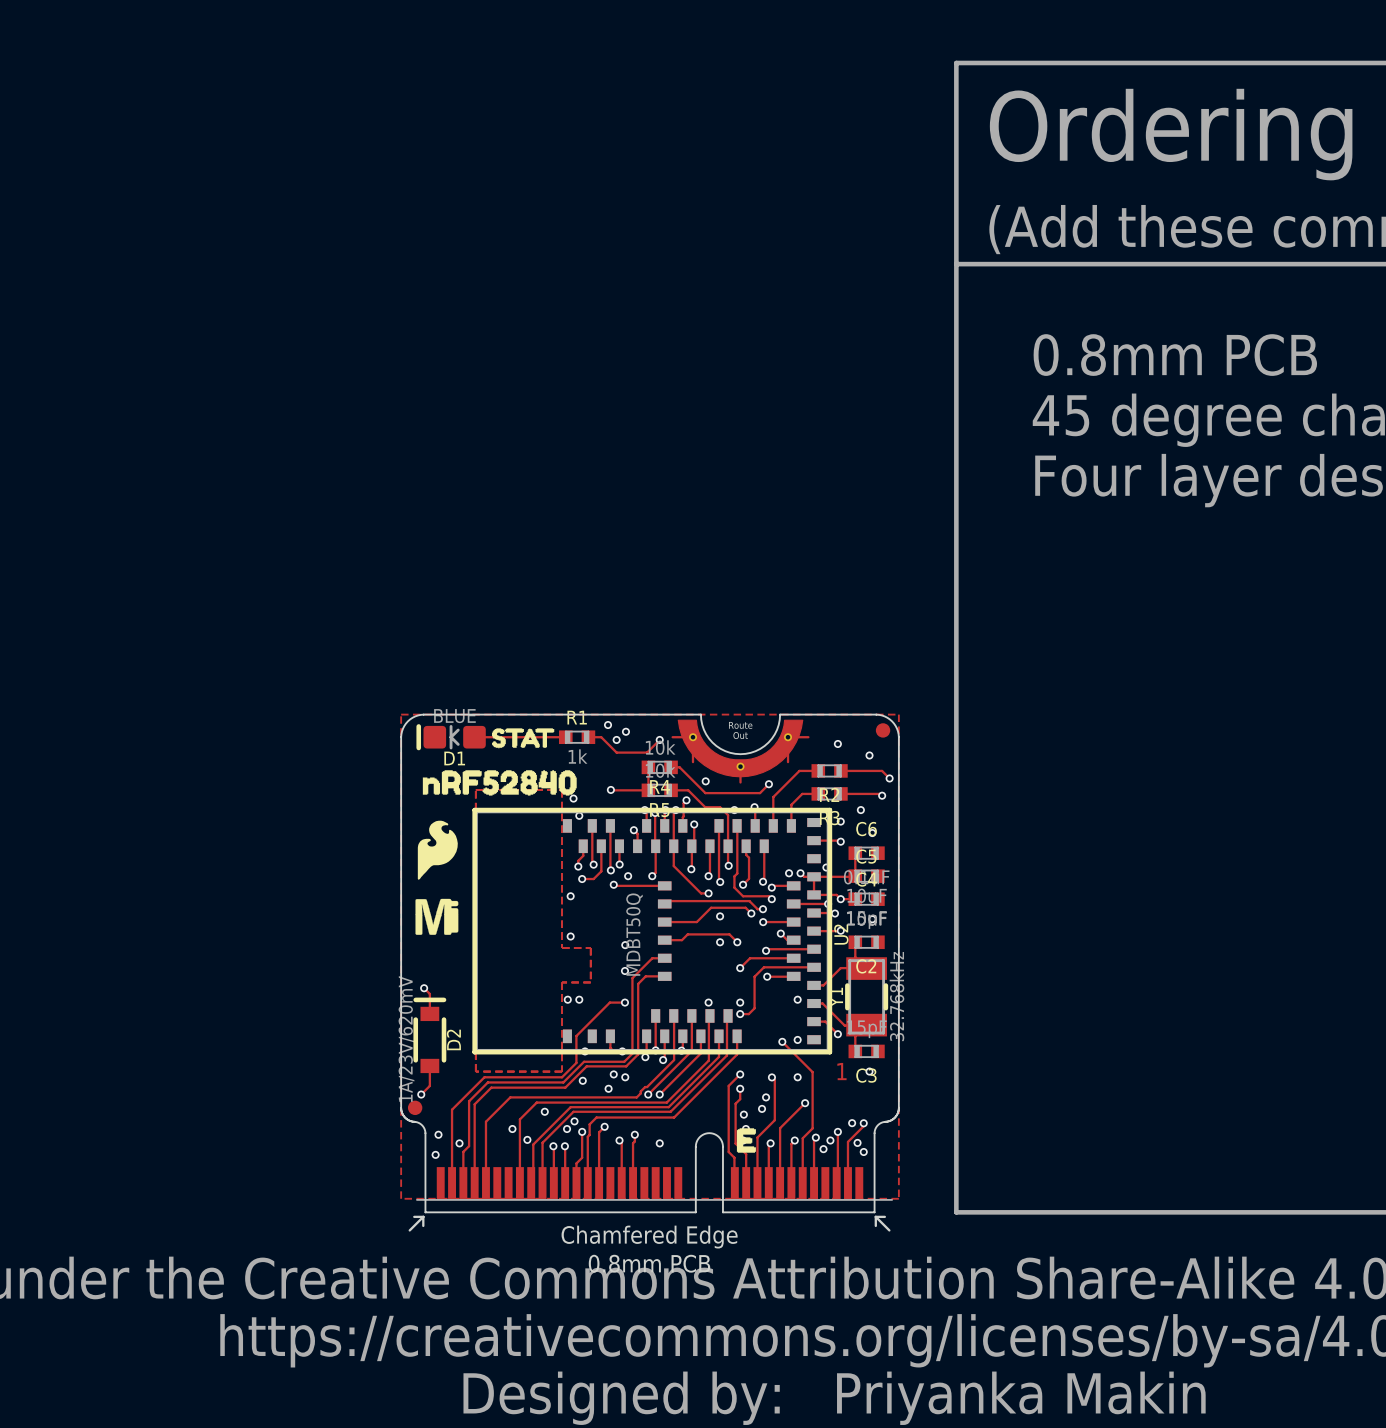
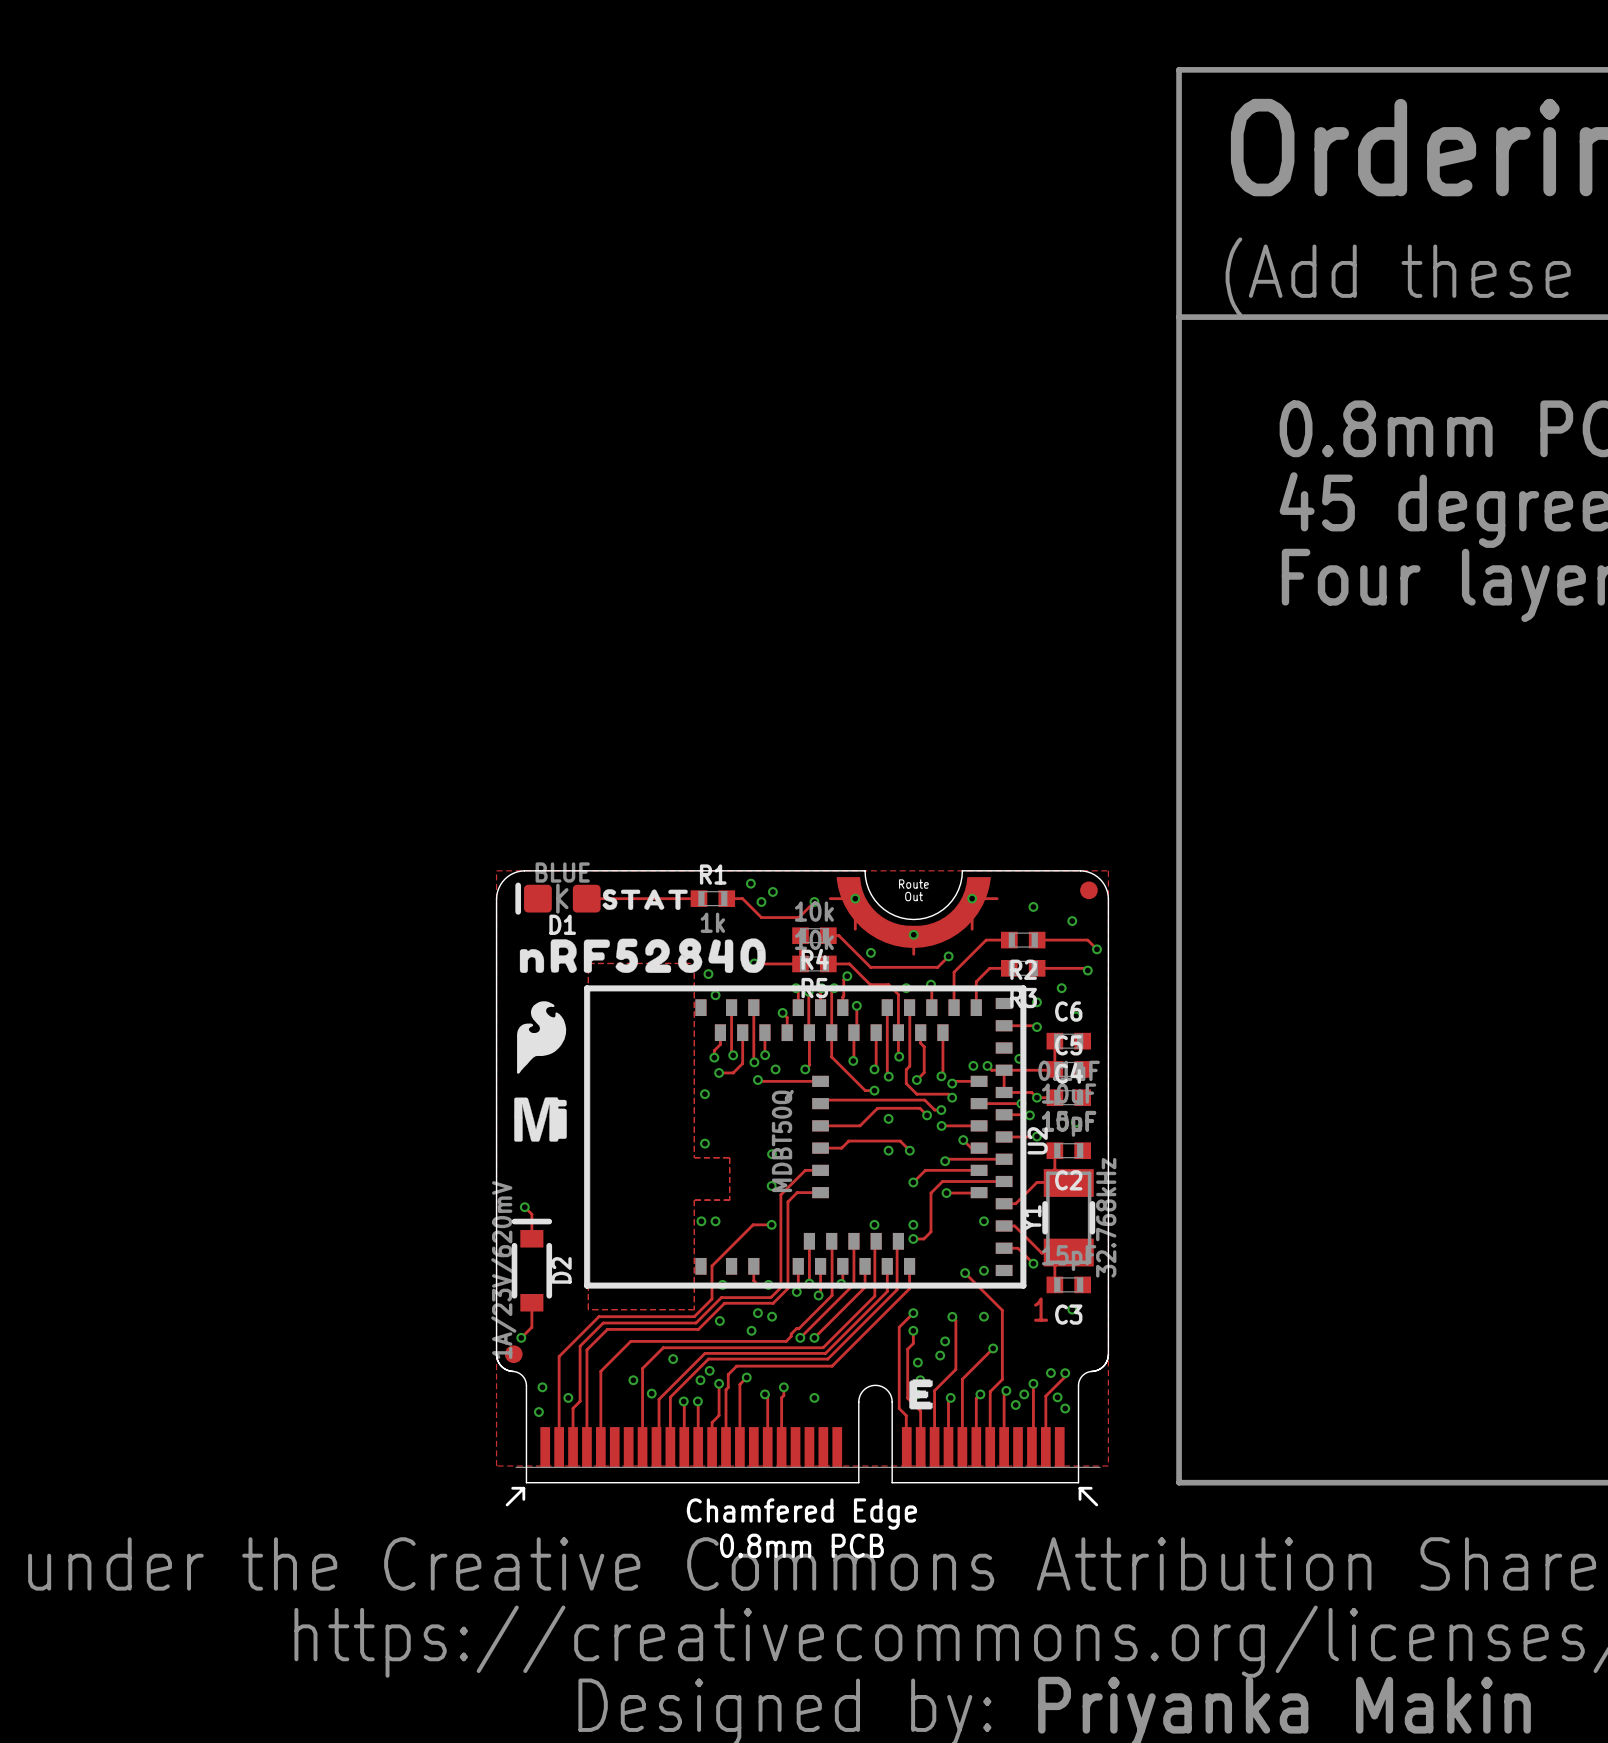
drawing shape: [492, 728, 555, 749] -> [602, 889, 688, 911]
drawing shape: [422, 770, 577, 796] -> [519, 938, 766, 973]

